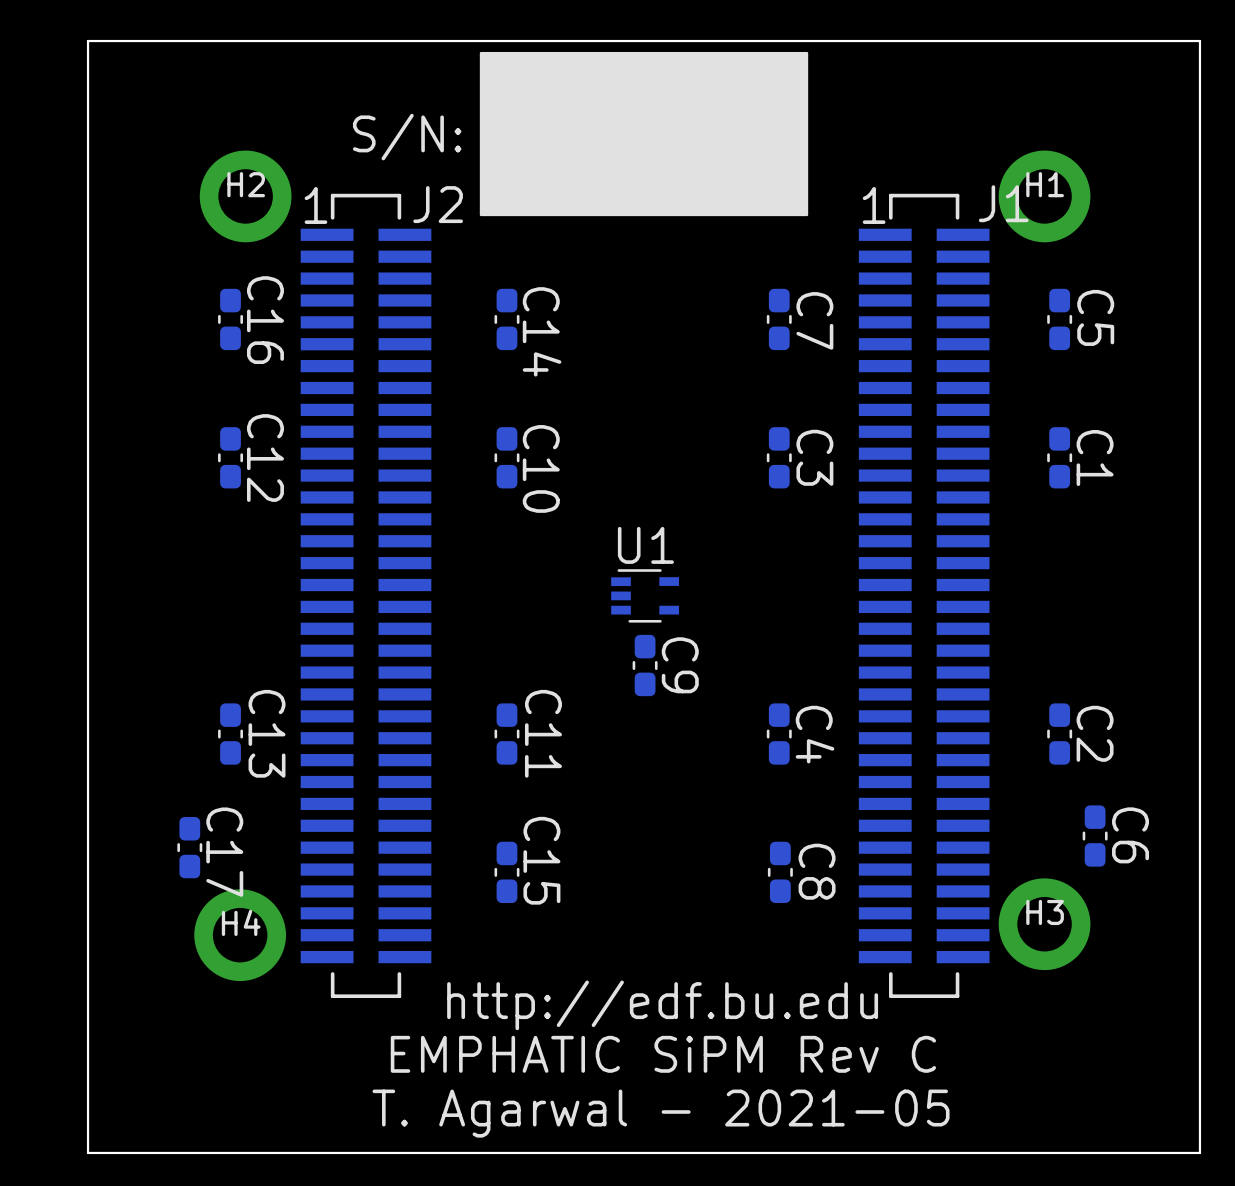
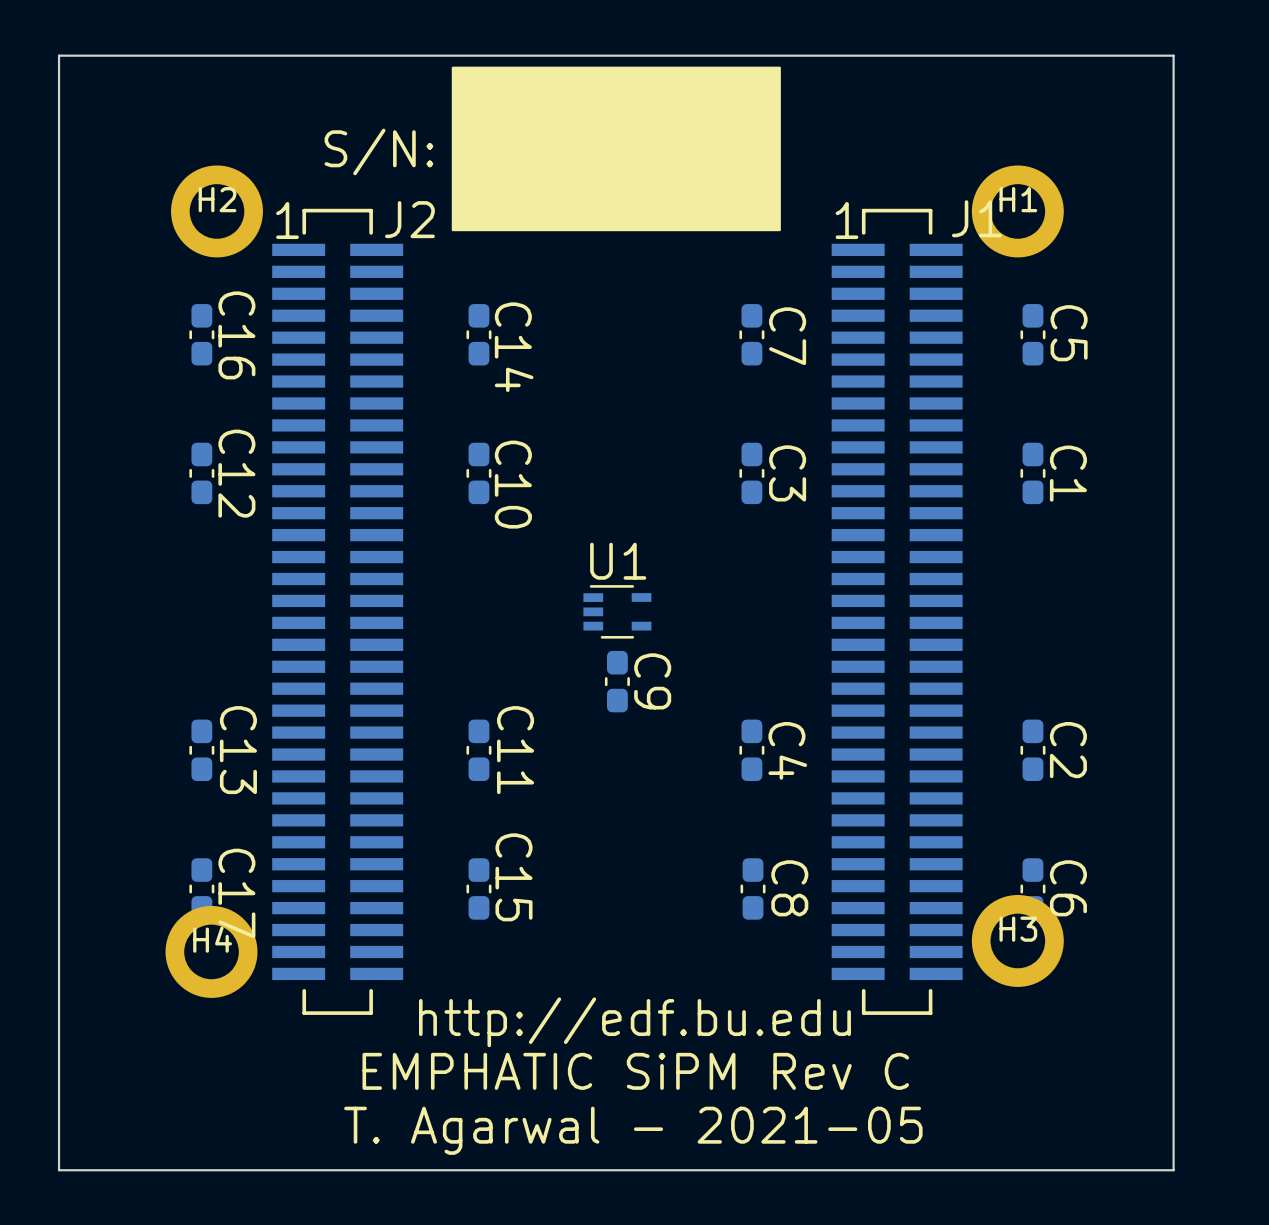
C6 position: (1095, 836) -> (1032, 888)
C17 position: (189, 847) -> (201, 888)

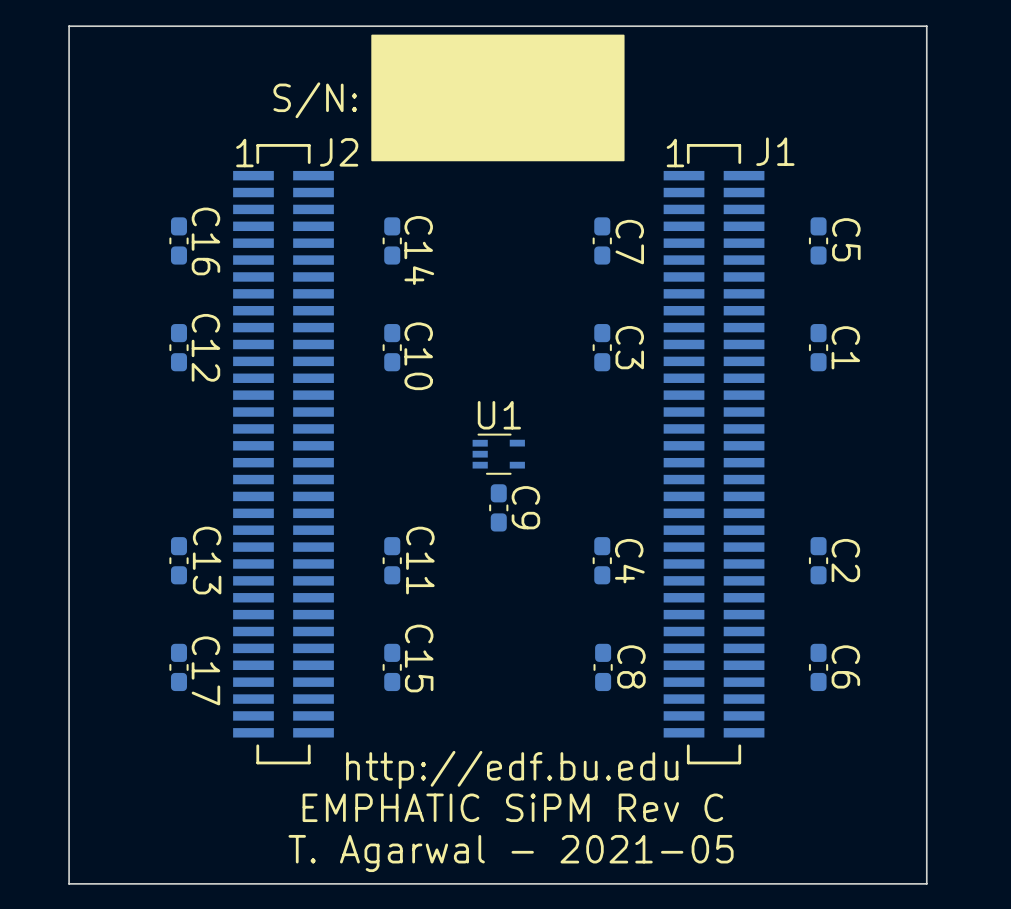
H2: (217, 211) -> none
H1: (1017, 211) -> none
H3: (1017, 940) -> none
H4: (211, 951) -> none

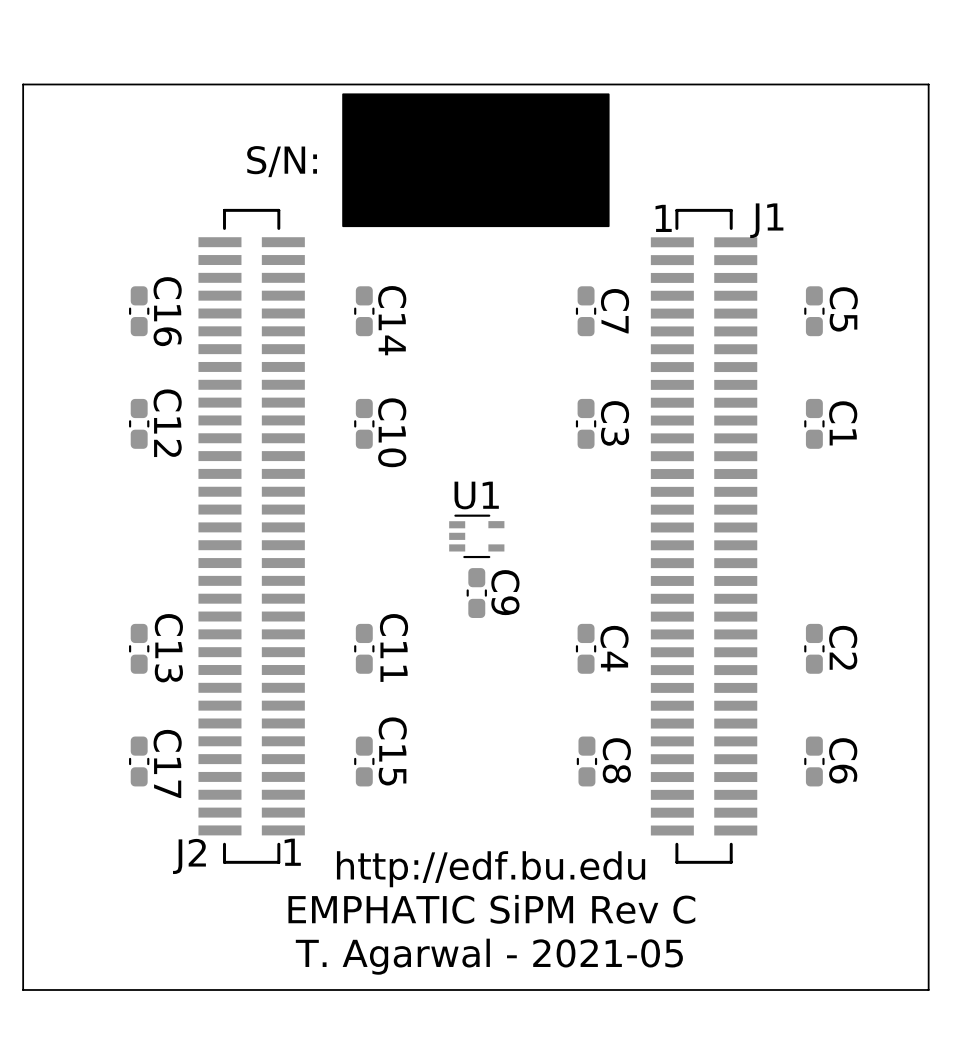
J2 rotation: 0° (283, 454) -> 180° (251, 536)

